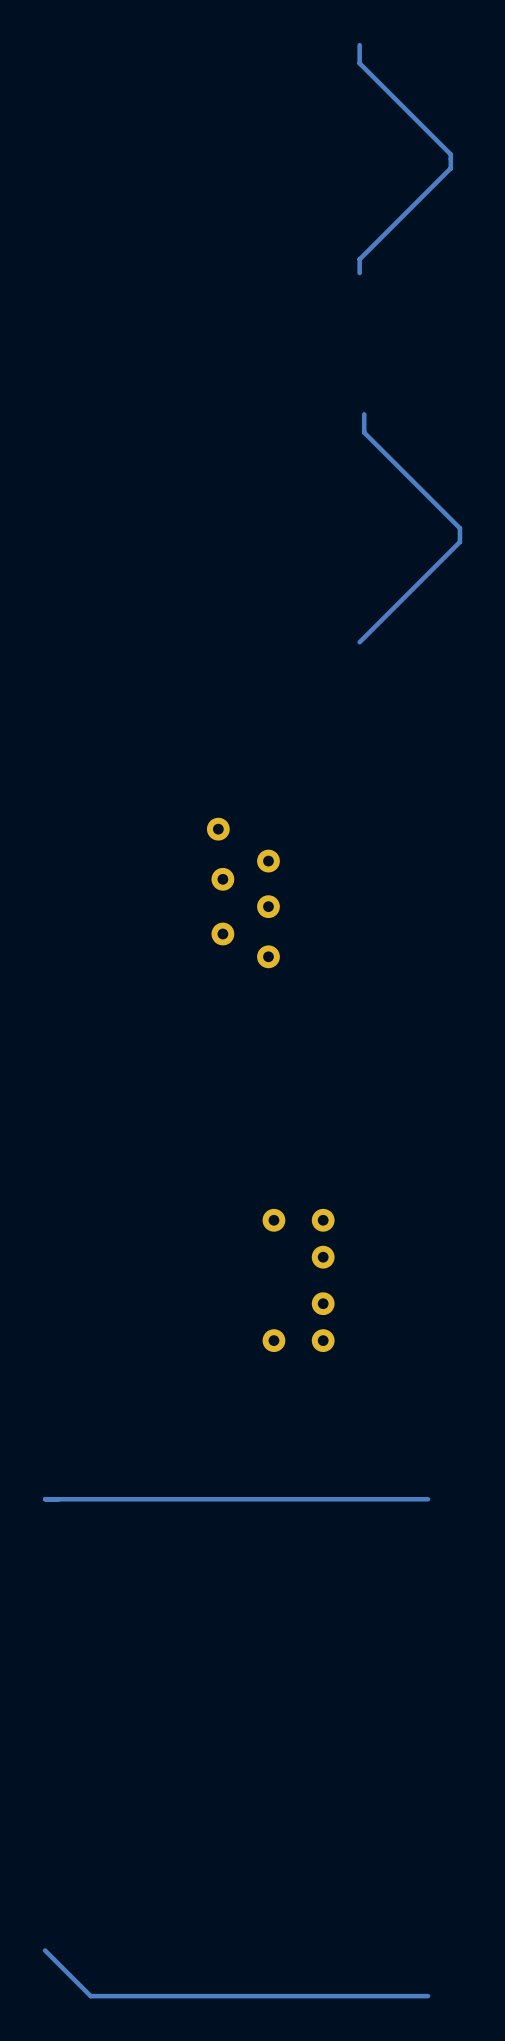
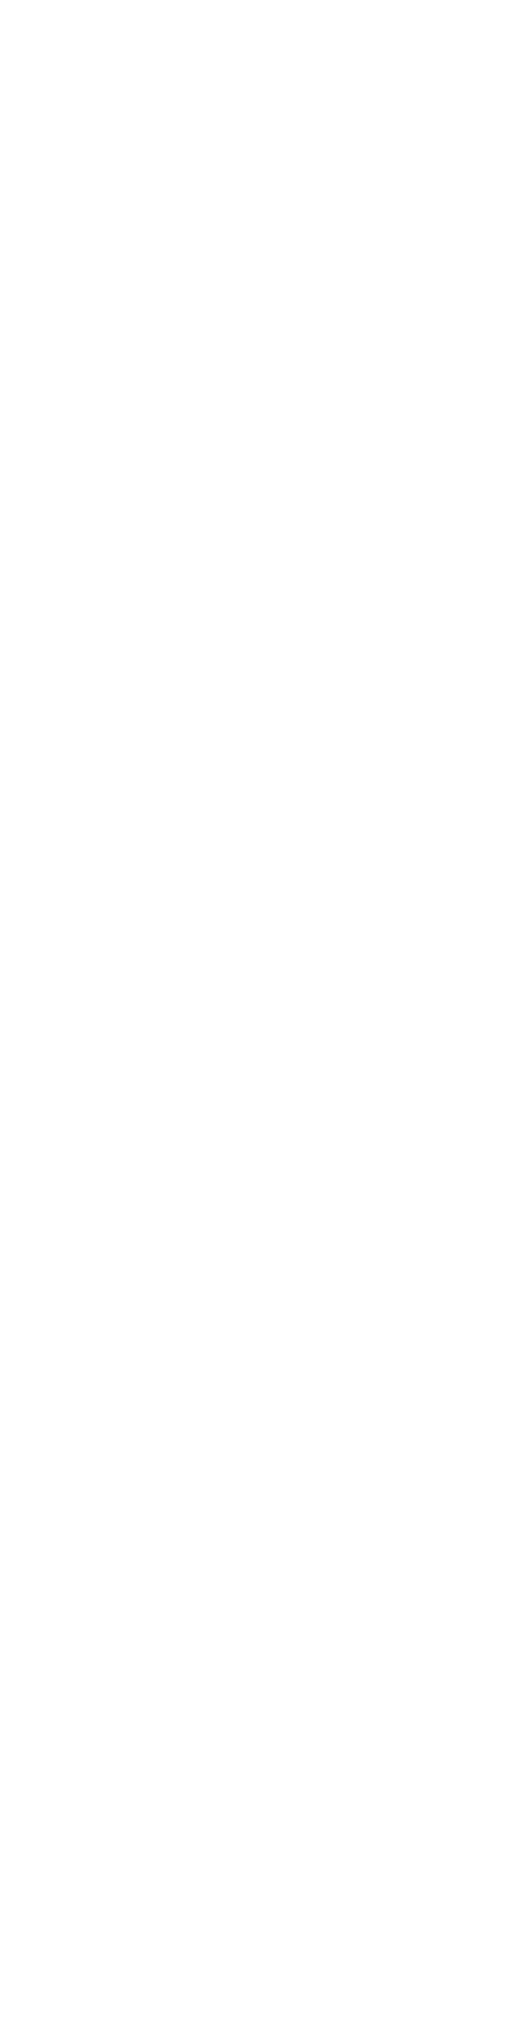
track: (359, 45) (359, 63) (450, 154) (450, 168) (359, 259) (359, 273) -> none
track: (364, 414) (364, 432) (459, 528) (459, 541) (359, 642) -> none
part: (243, 892) -> none
part: (298, 1280) -> none
track: (428, 1499) (45, 1499) -> none
track: (45, 1950) (90, 1996) (428, 1996) -> none

